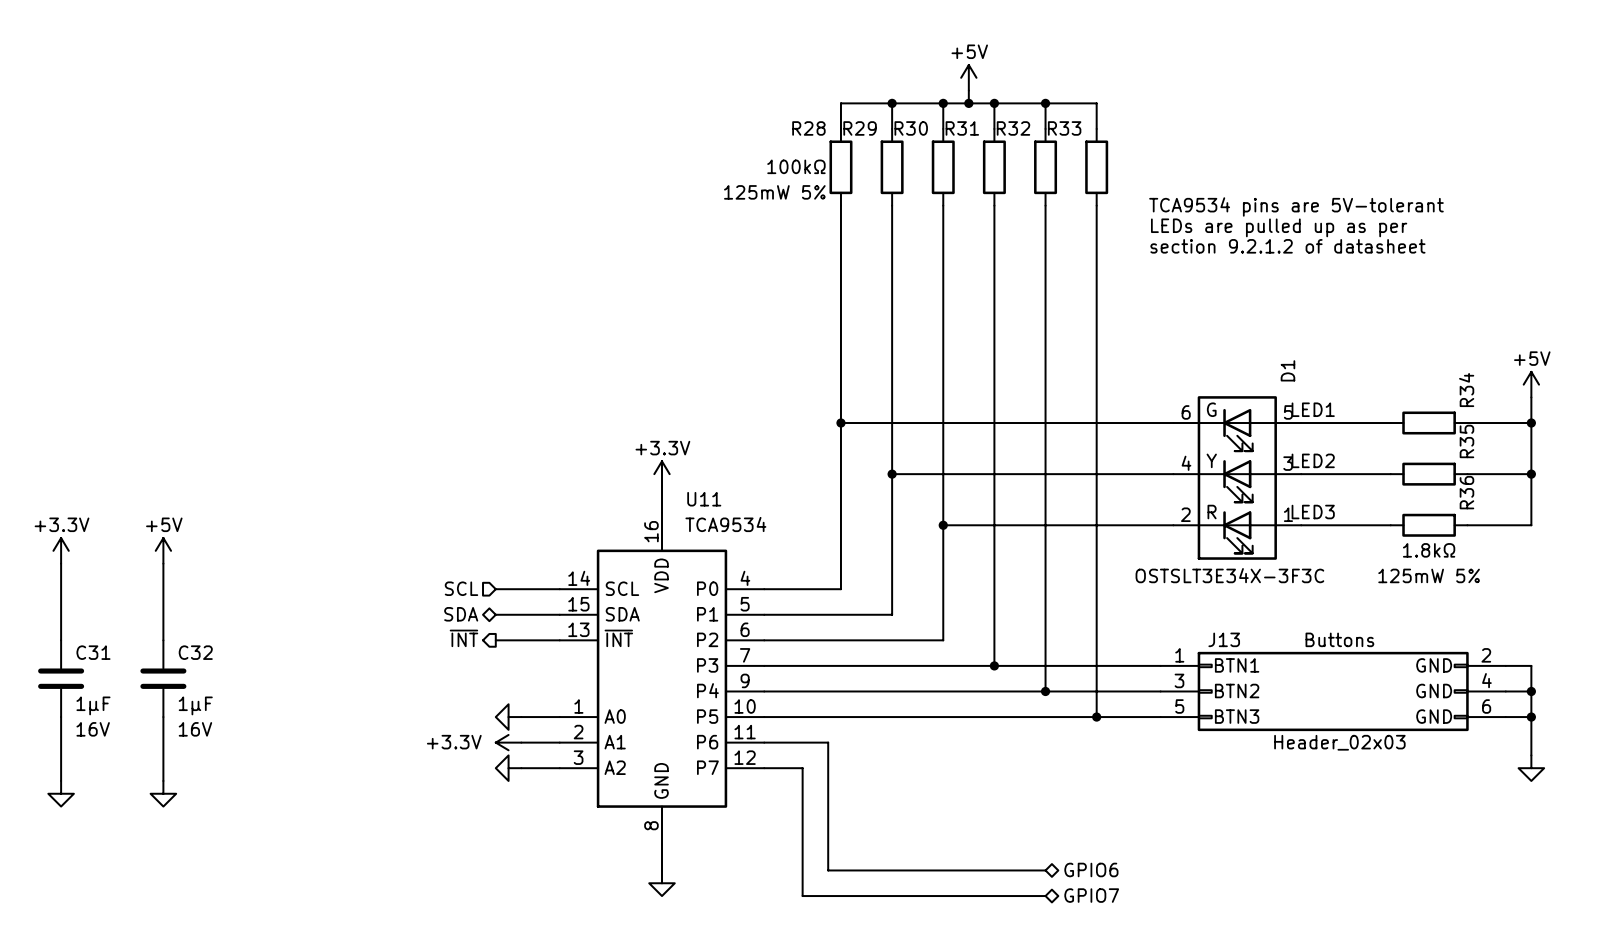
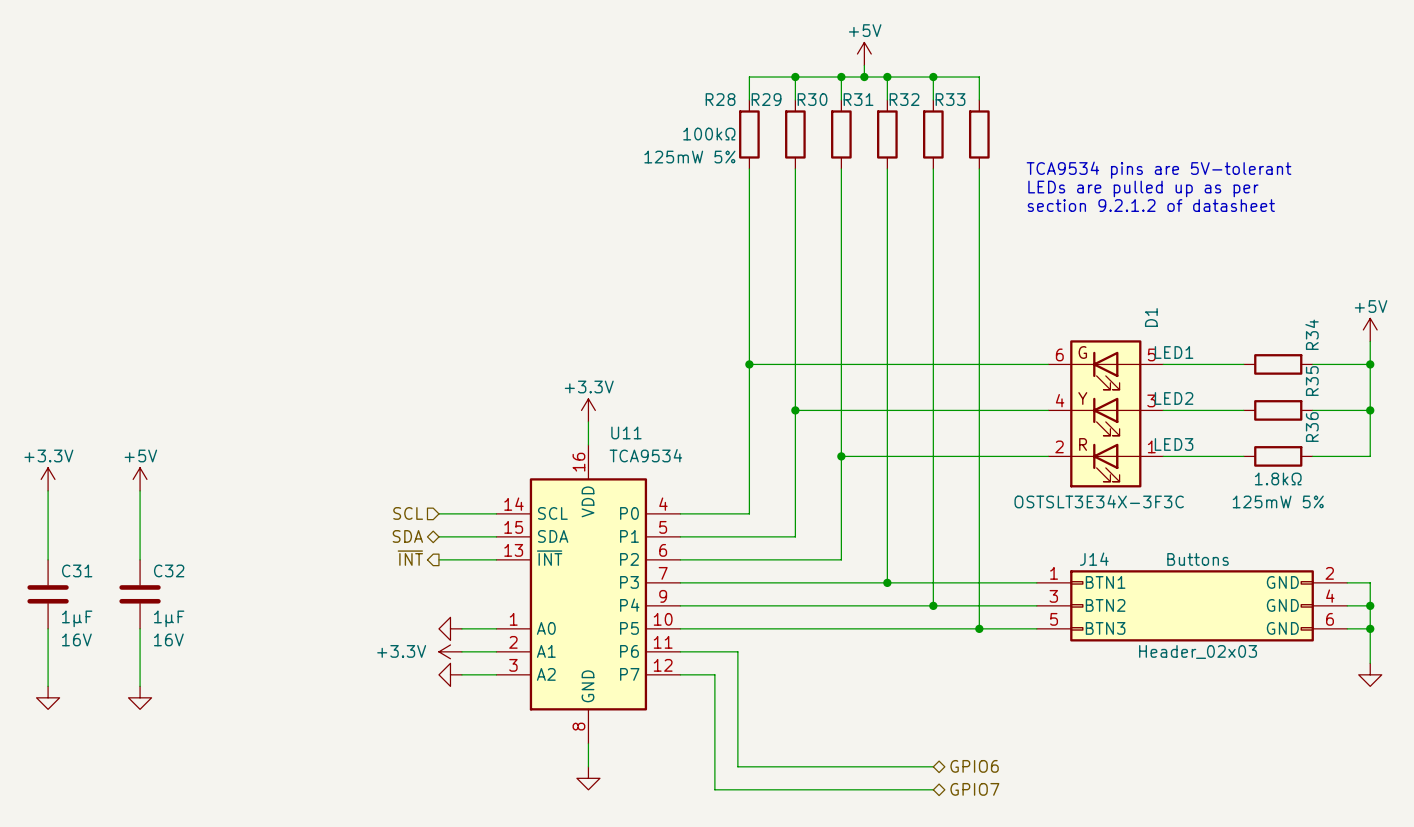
J13 name: J13 (1224, 639) -> J14 (1094, 559)

